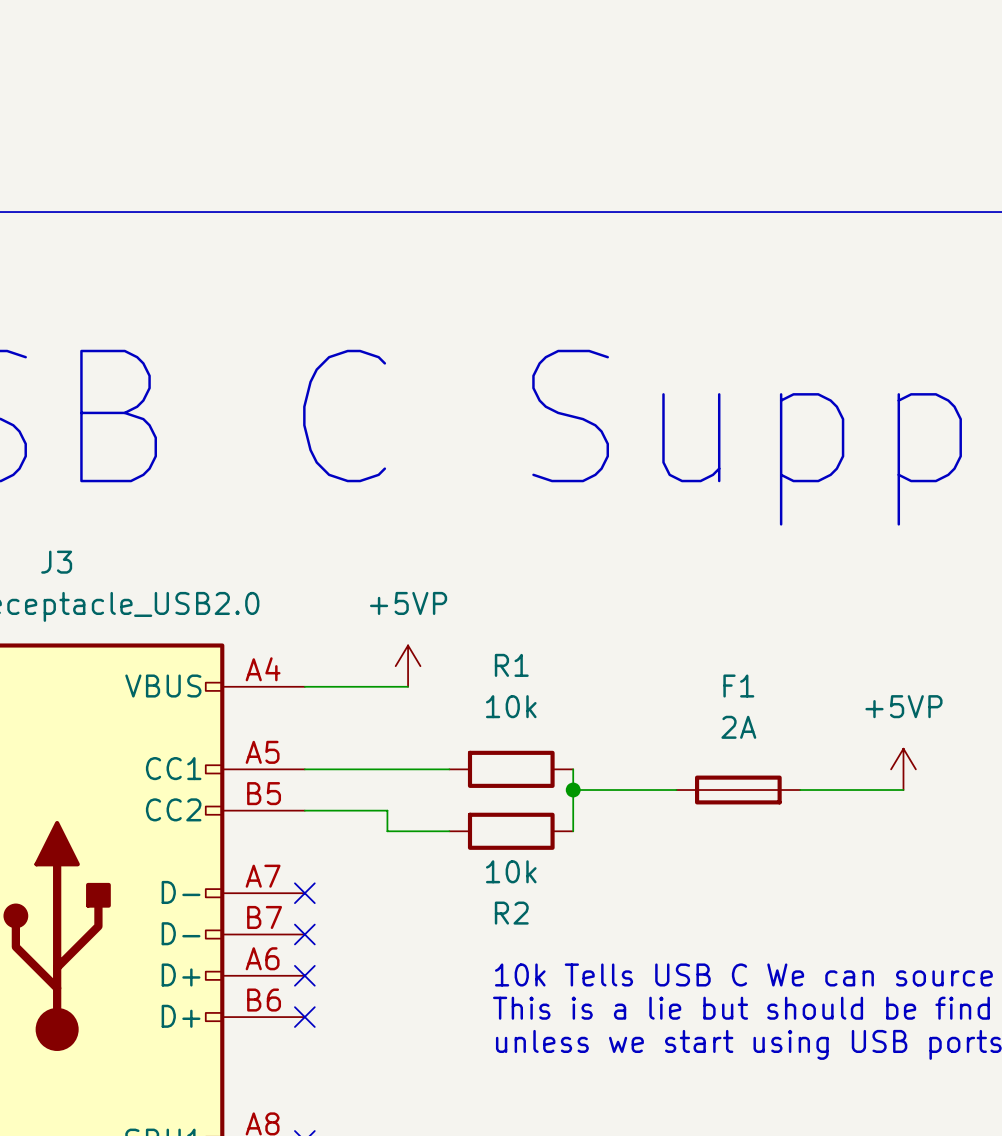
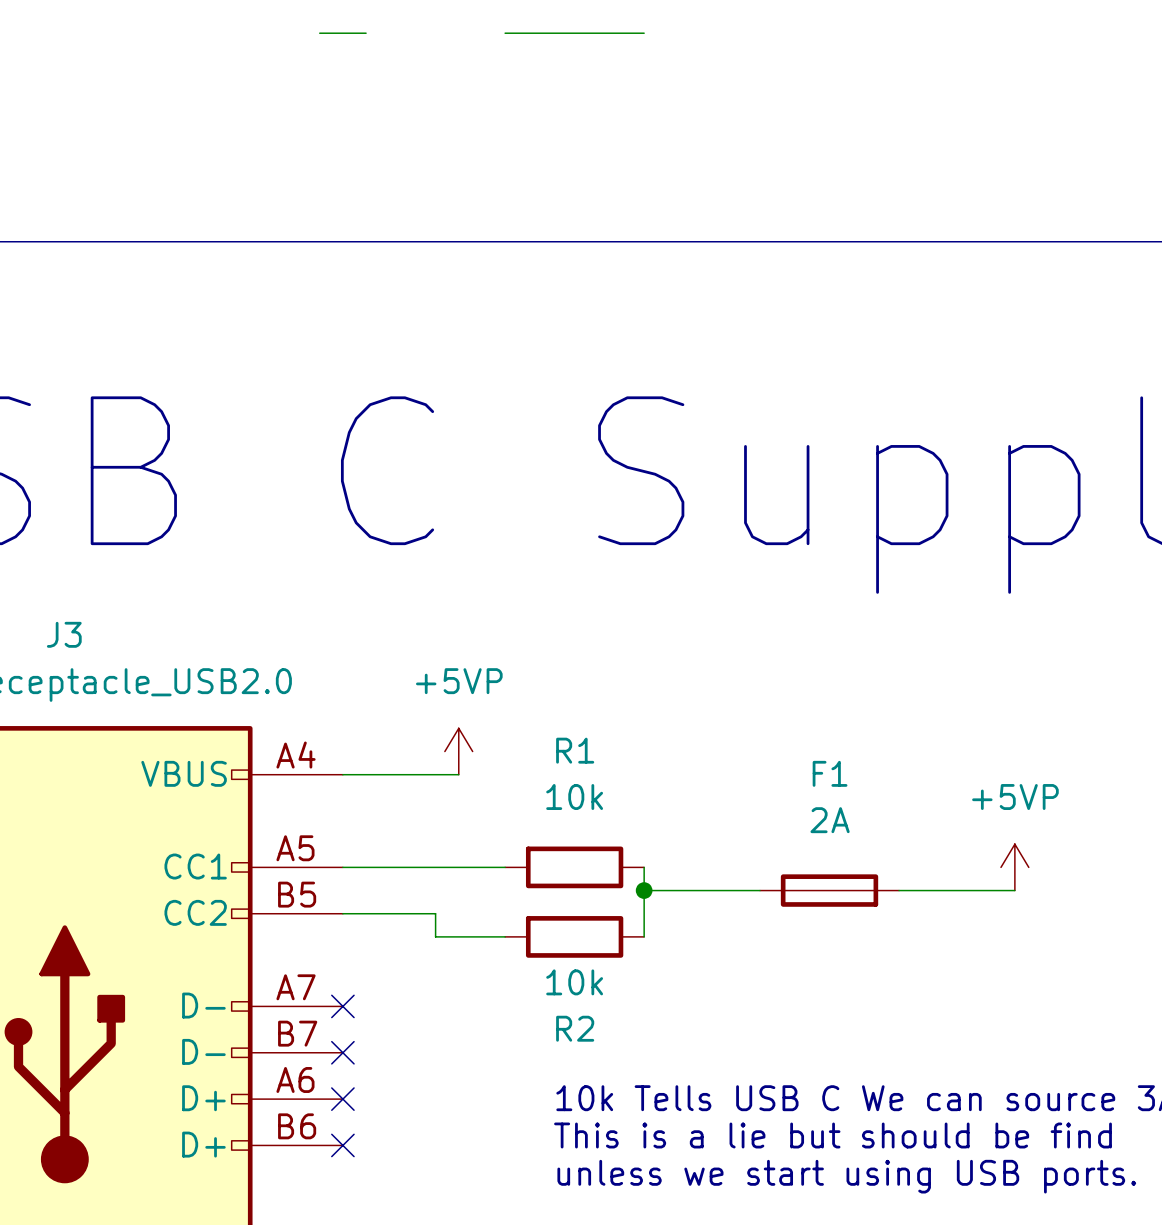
wire: none -> (319, 33) (366, 33)
wire: none -> (505, 33) (644, 33)

